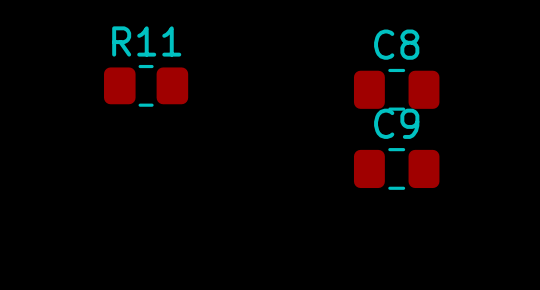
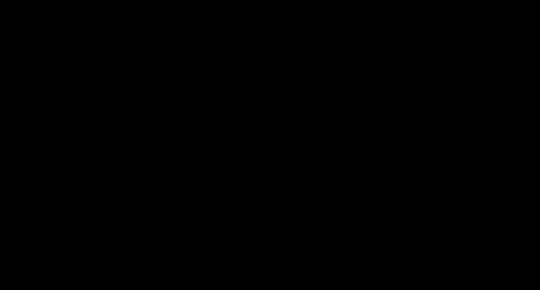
R11: (146, 85) -> none
C8: (396, 89) -> none
C9: (396, 168) -> none

